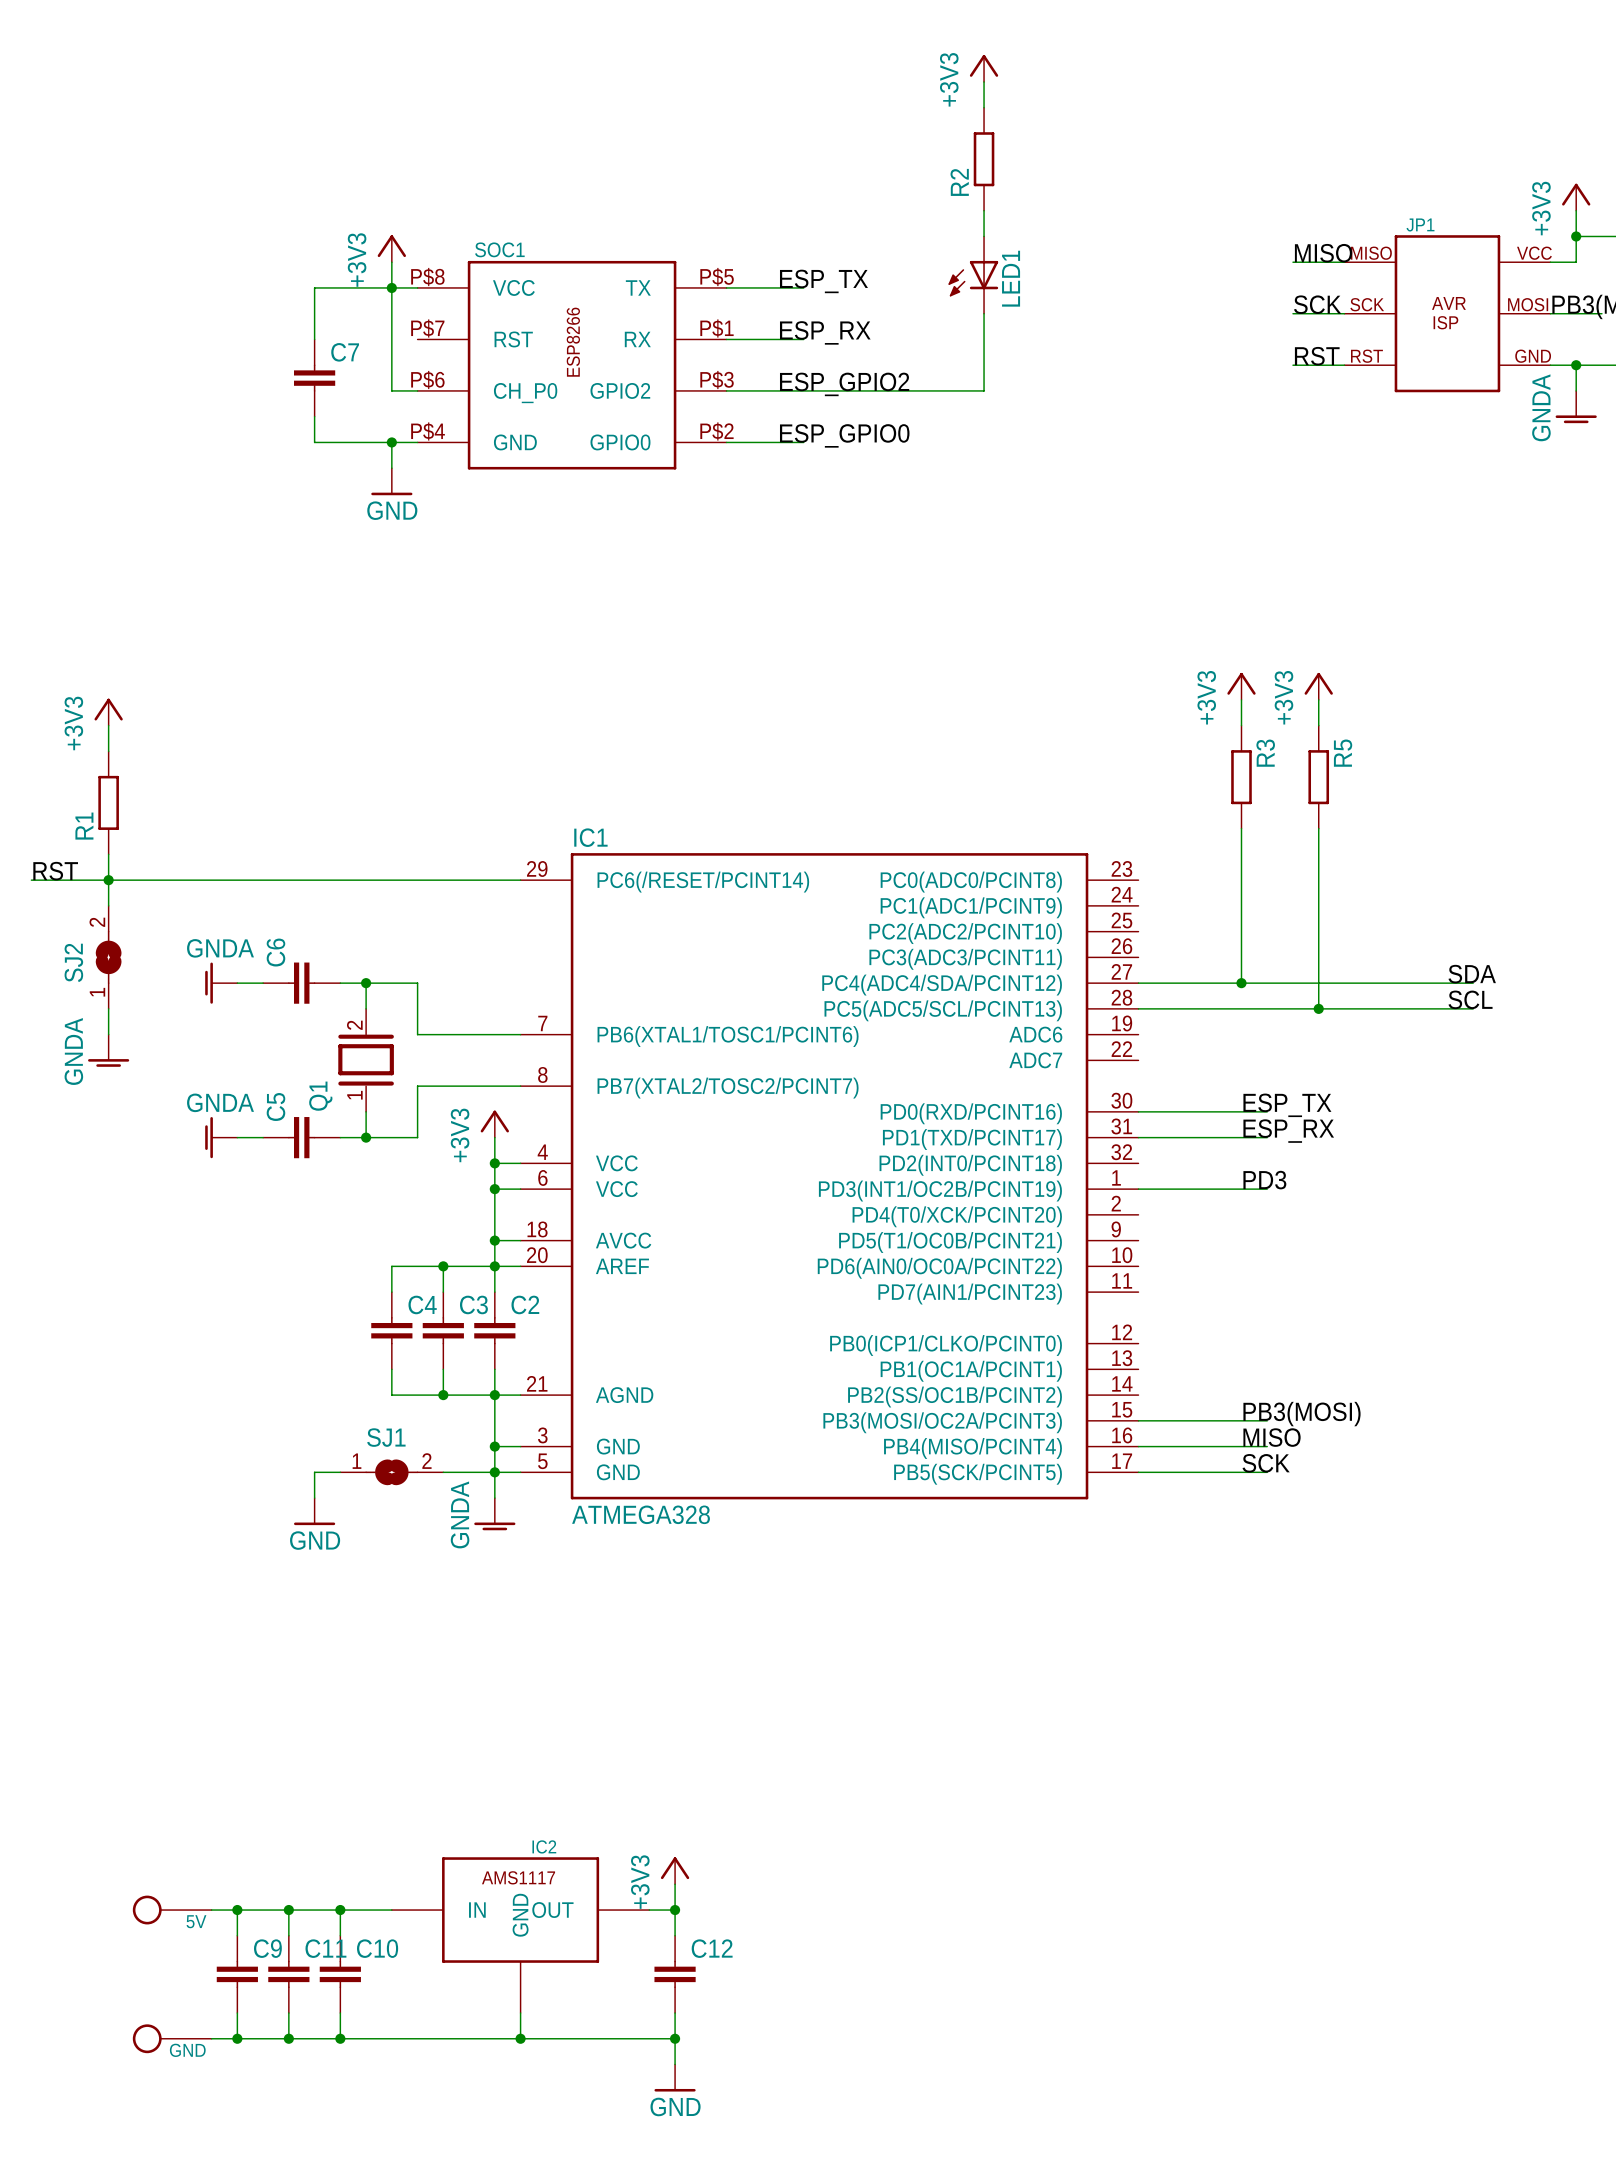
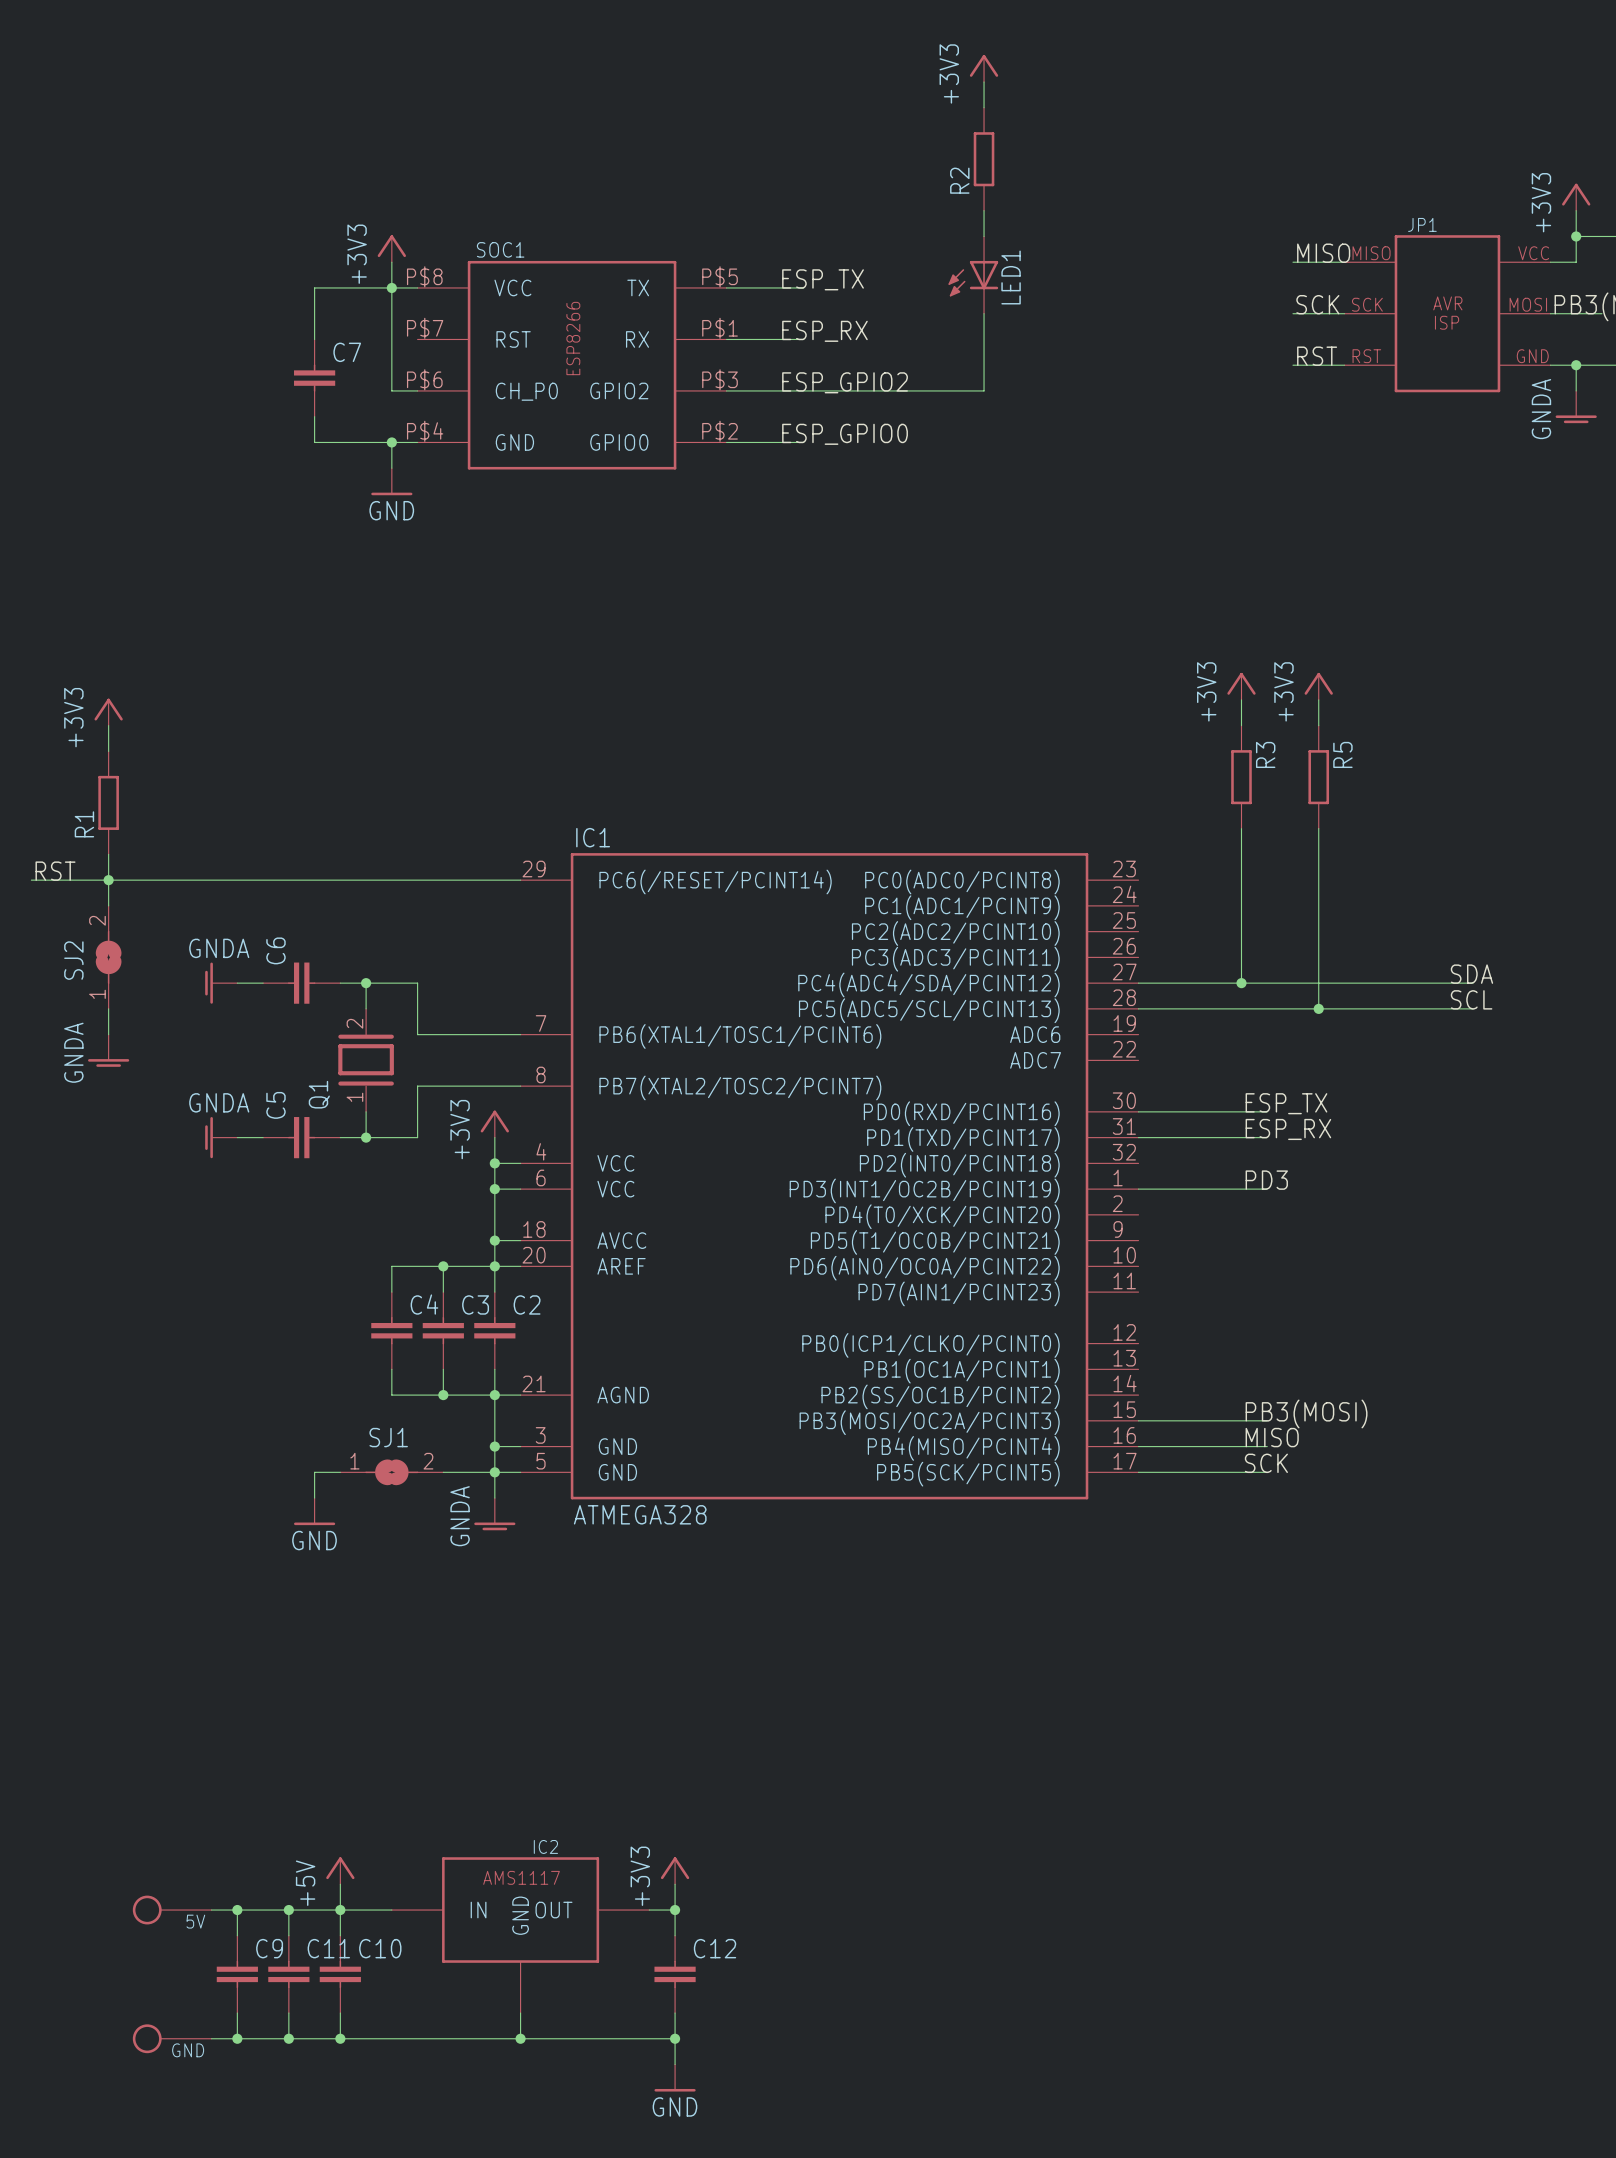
power symbol: none -> +5V (340, 1870)
wire: none -> (340, 1884) (340, 1910)

